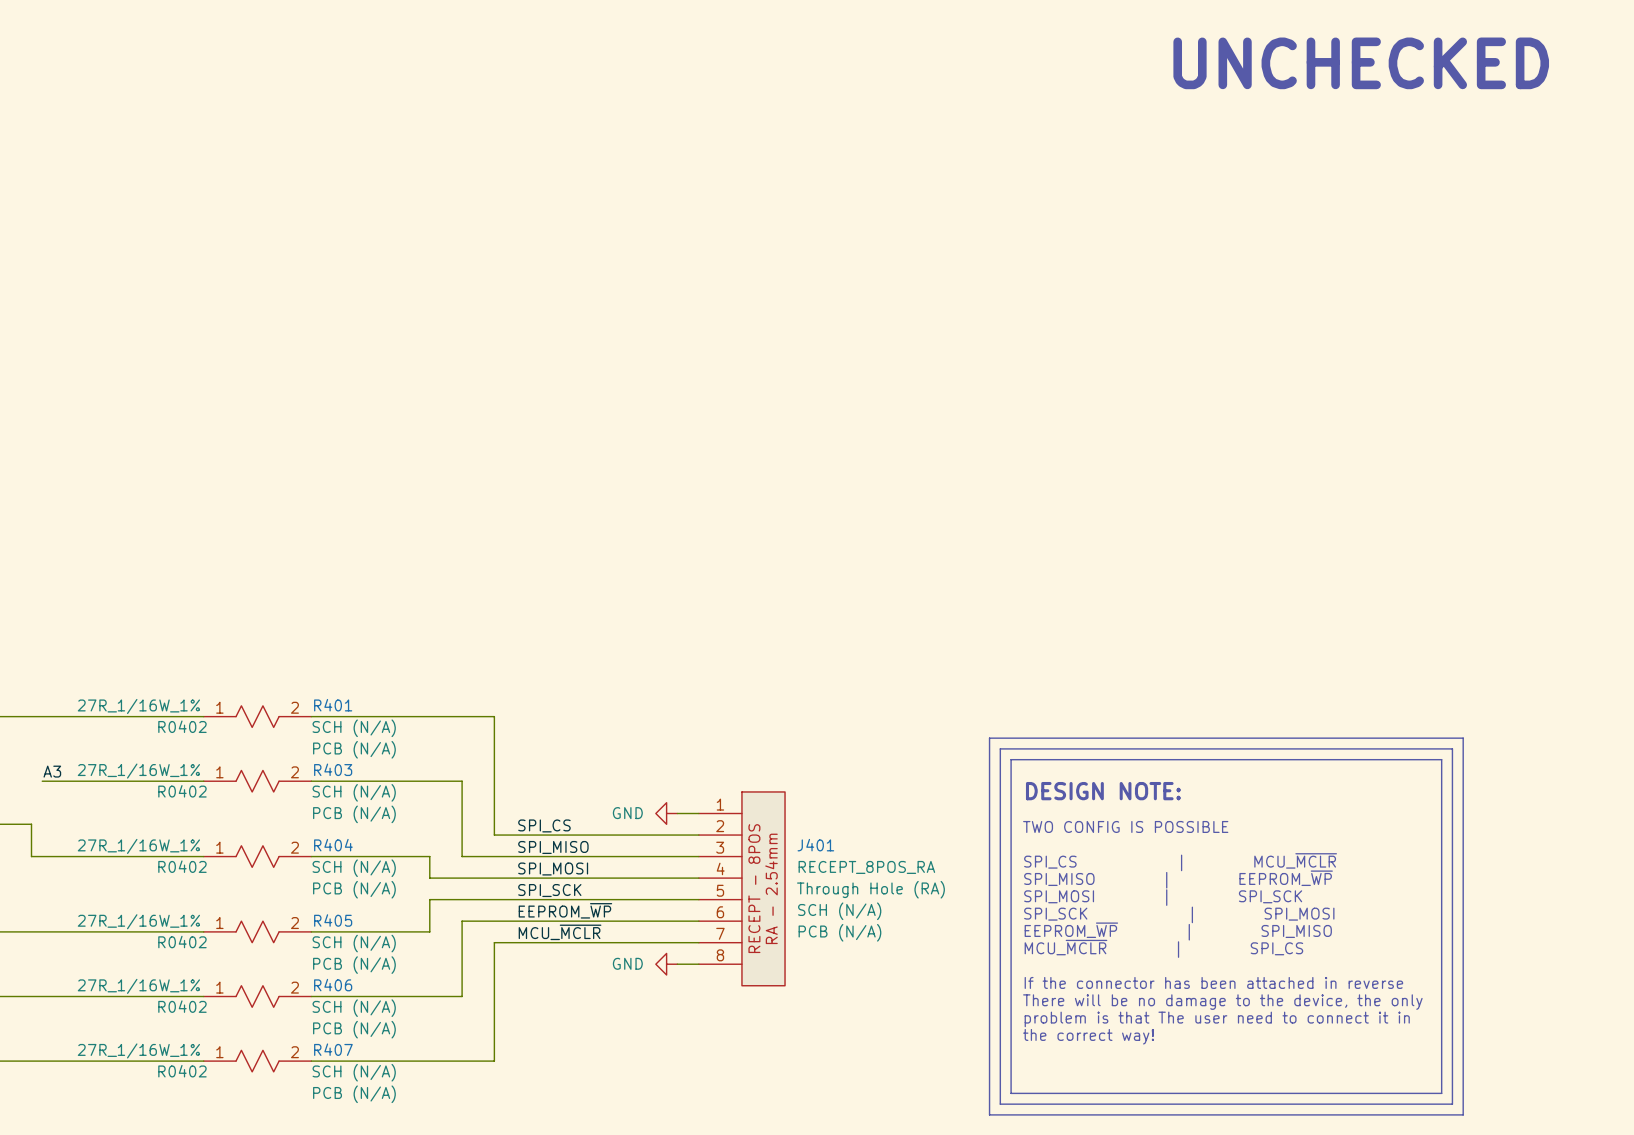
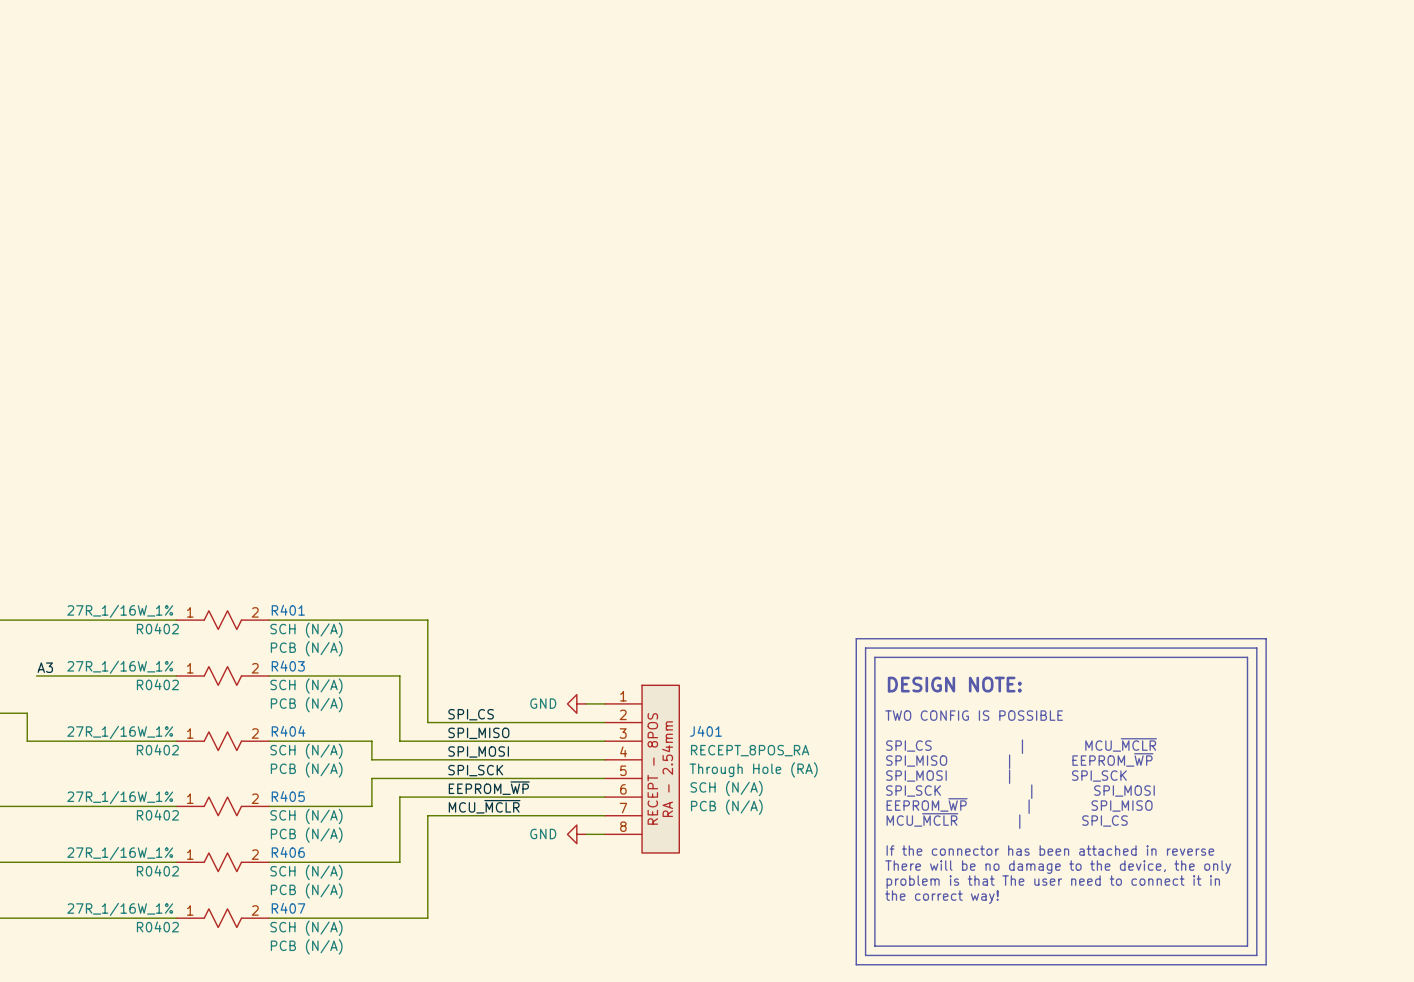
text: UNCHECKED (1361, 63) -> none

